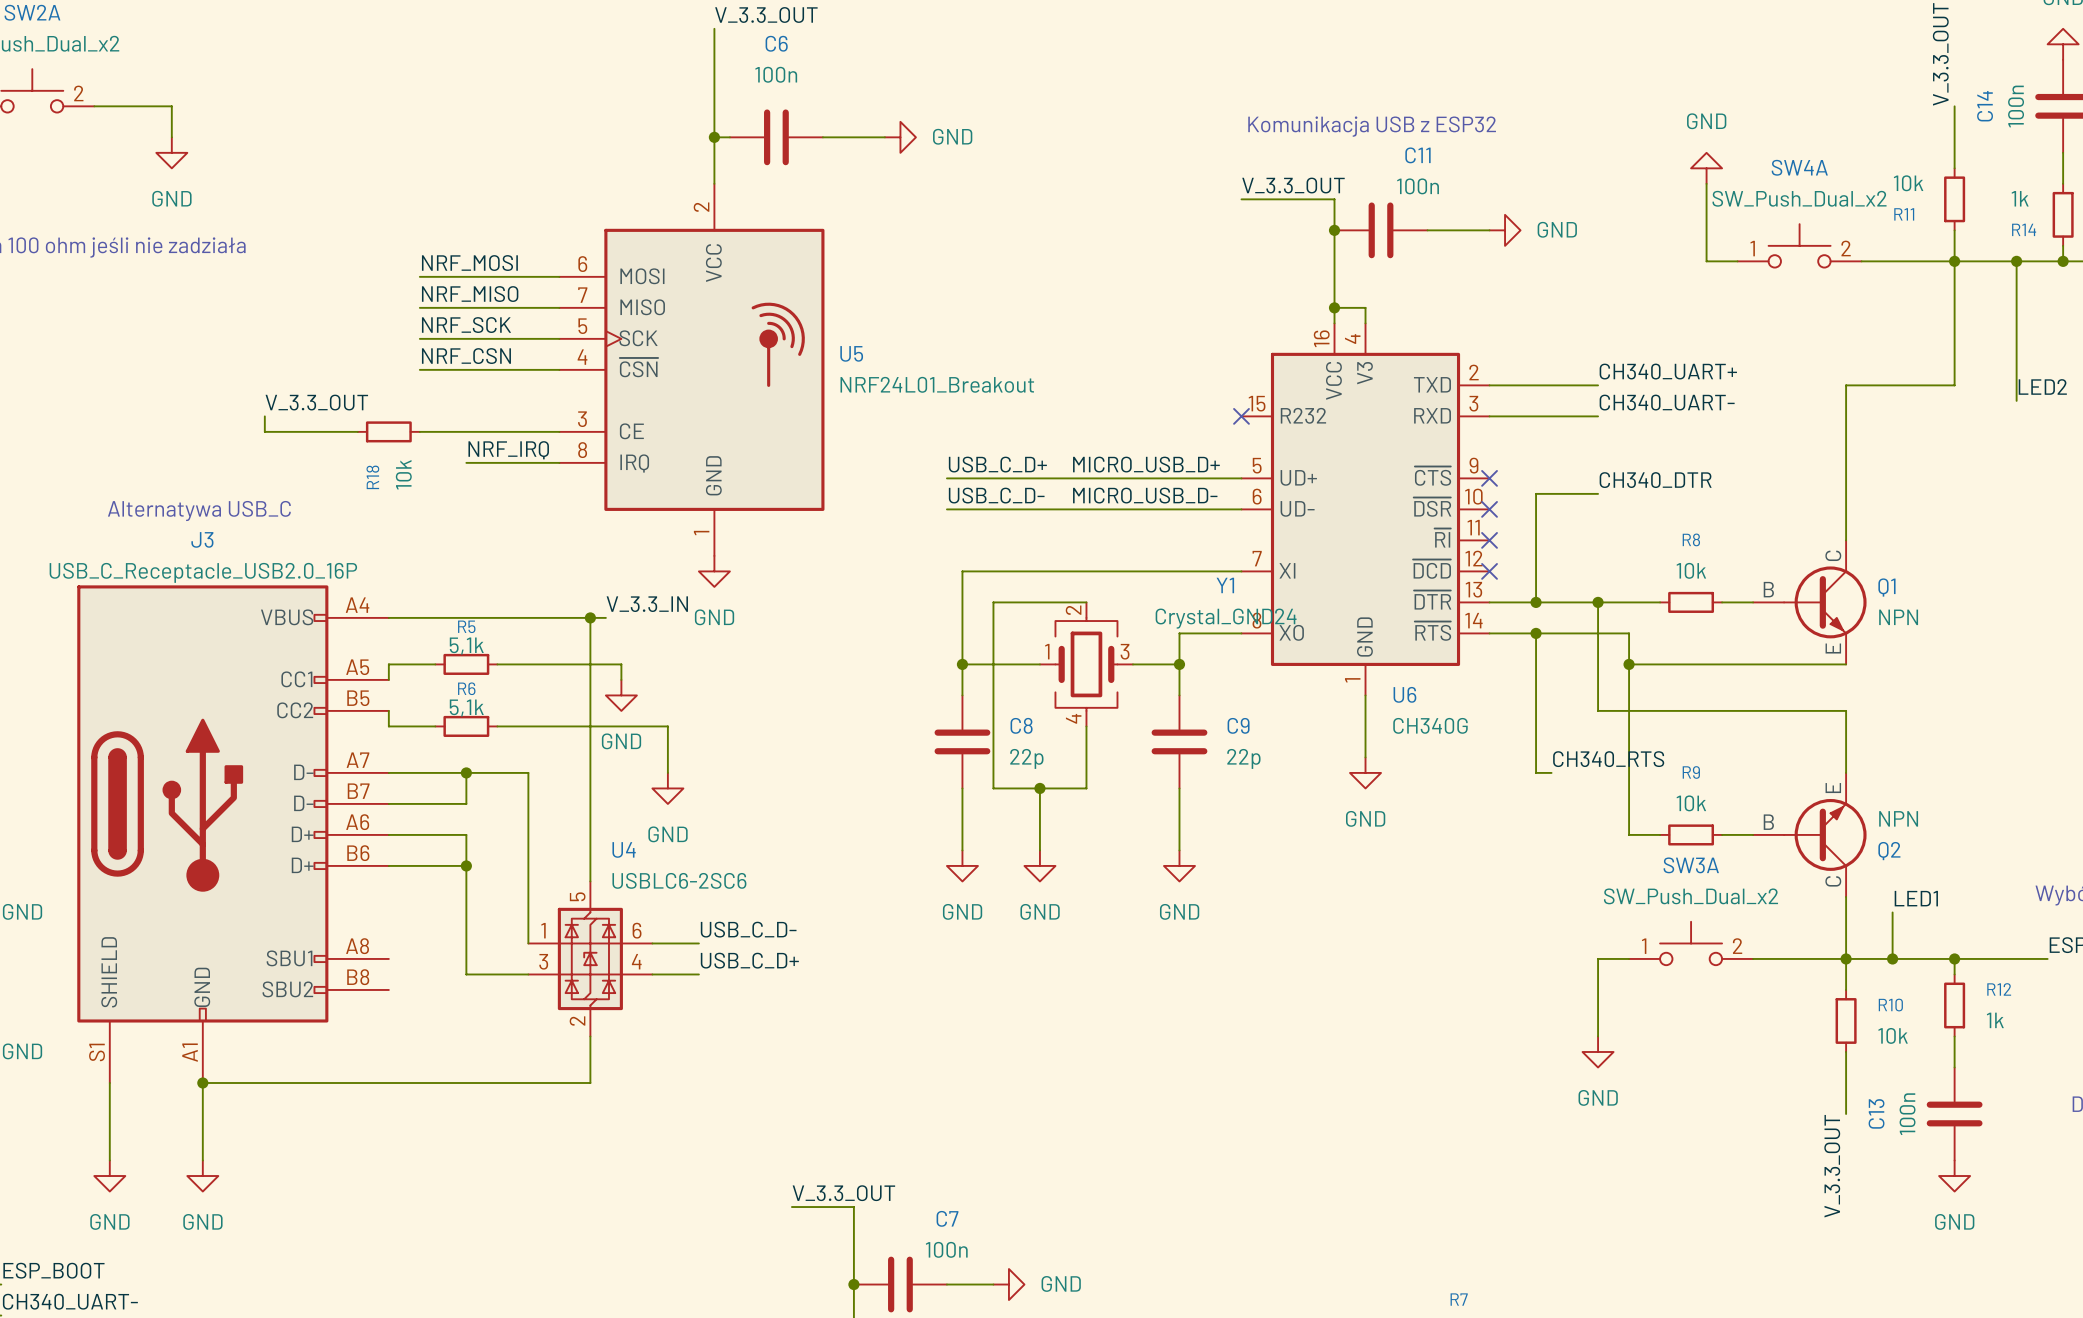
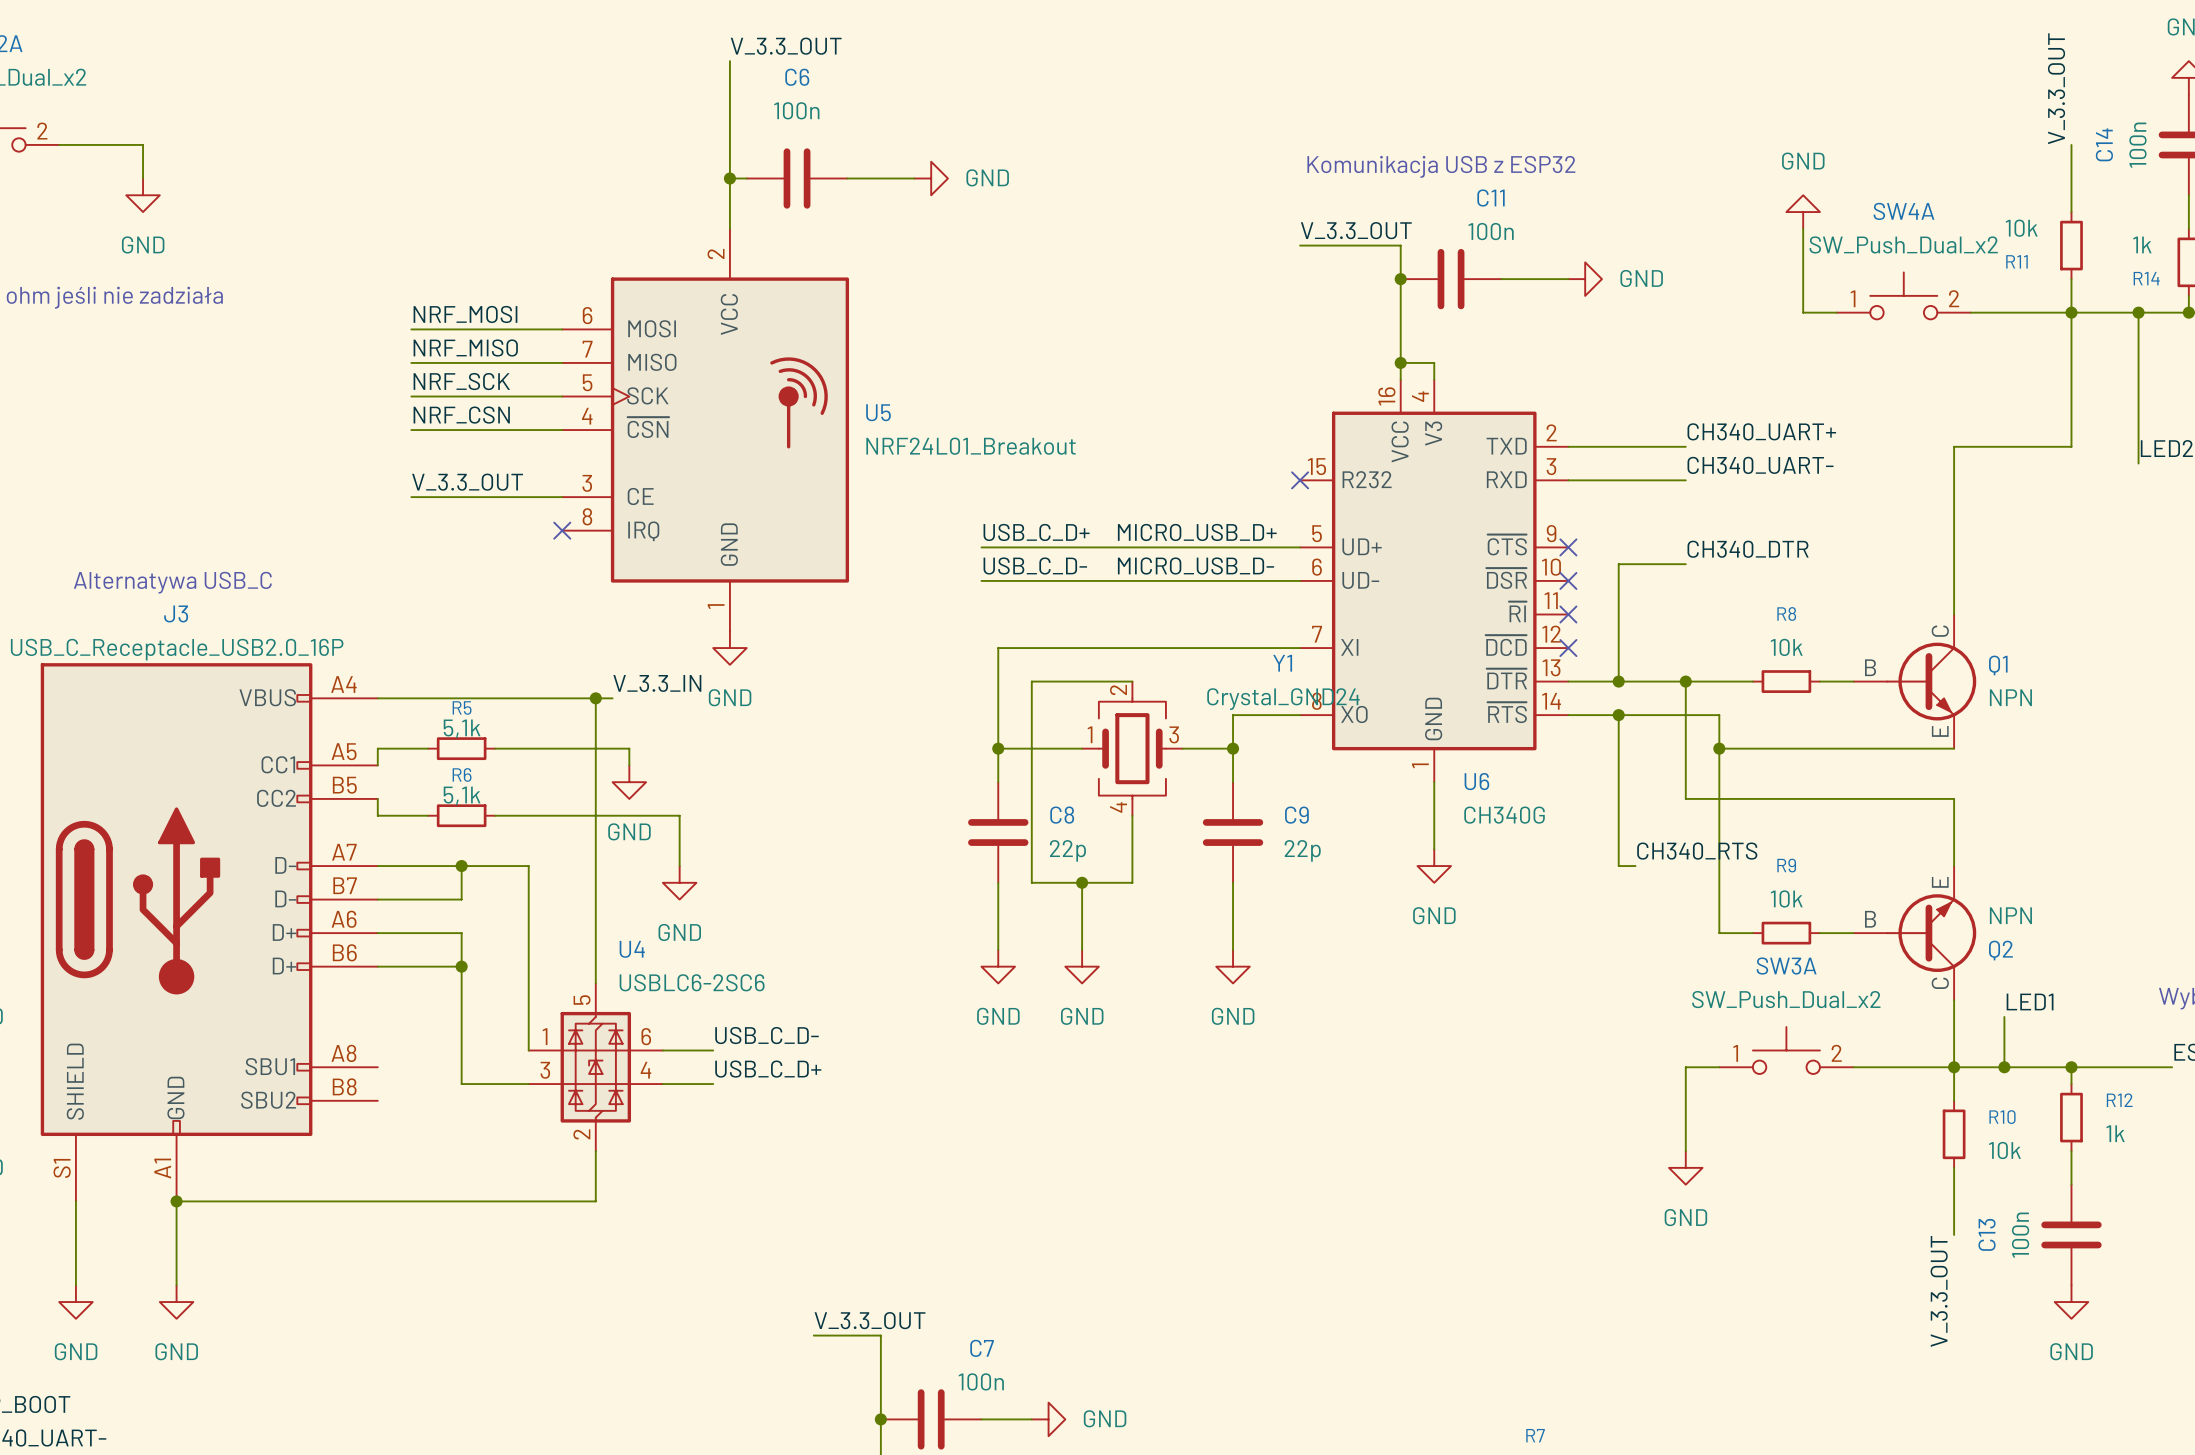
label position: V_3.3_OUT (316, 402) -> V_3.3_OUT (467, 482)
wire: (264, 416) (264, 431) (357, 431) -> none
R18: 10k (388, 431) -> none
label: NRF_IRQ (508, 450) -> none
wire: (466, 462) (559, 462) -> none
no-connect mark: none -> (562, 530)

